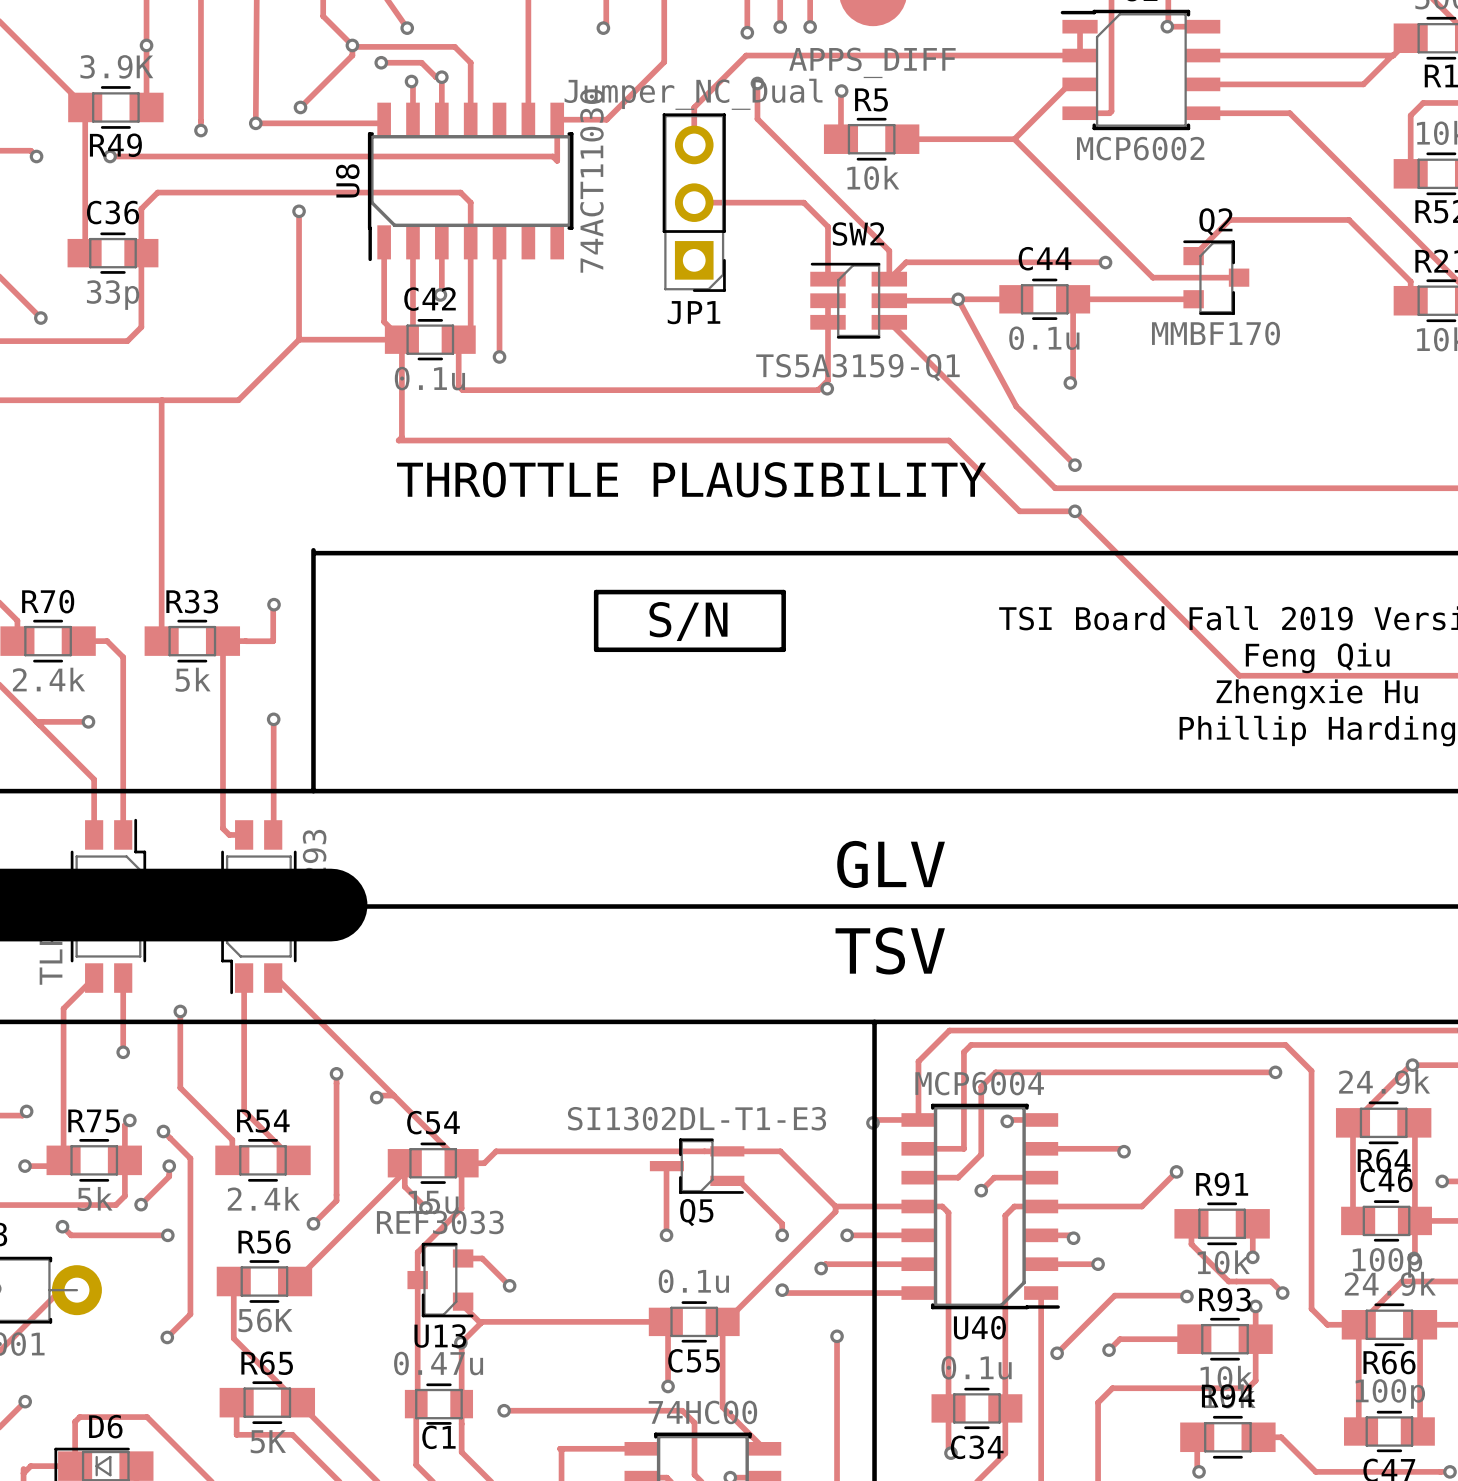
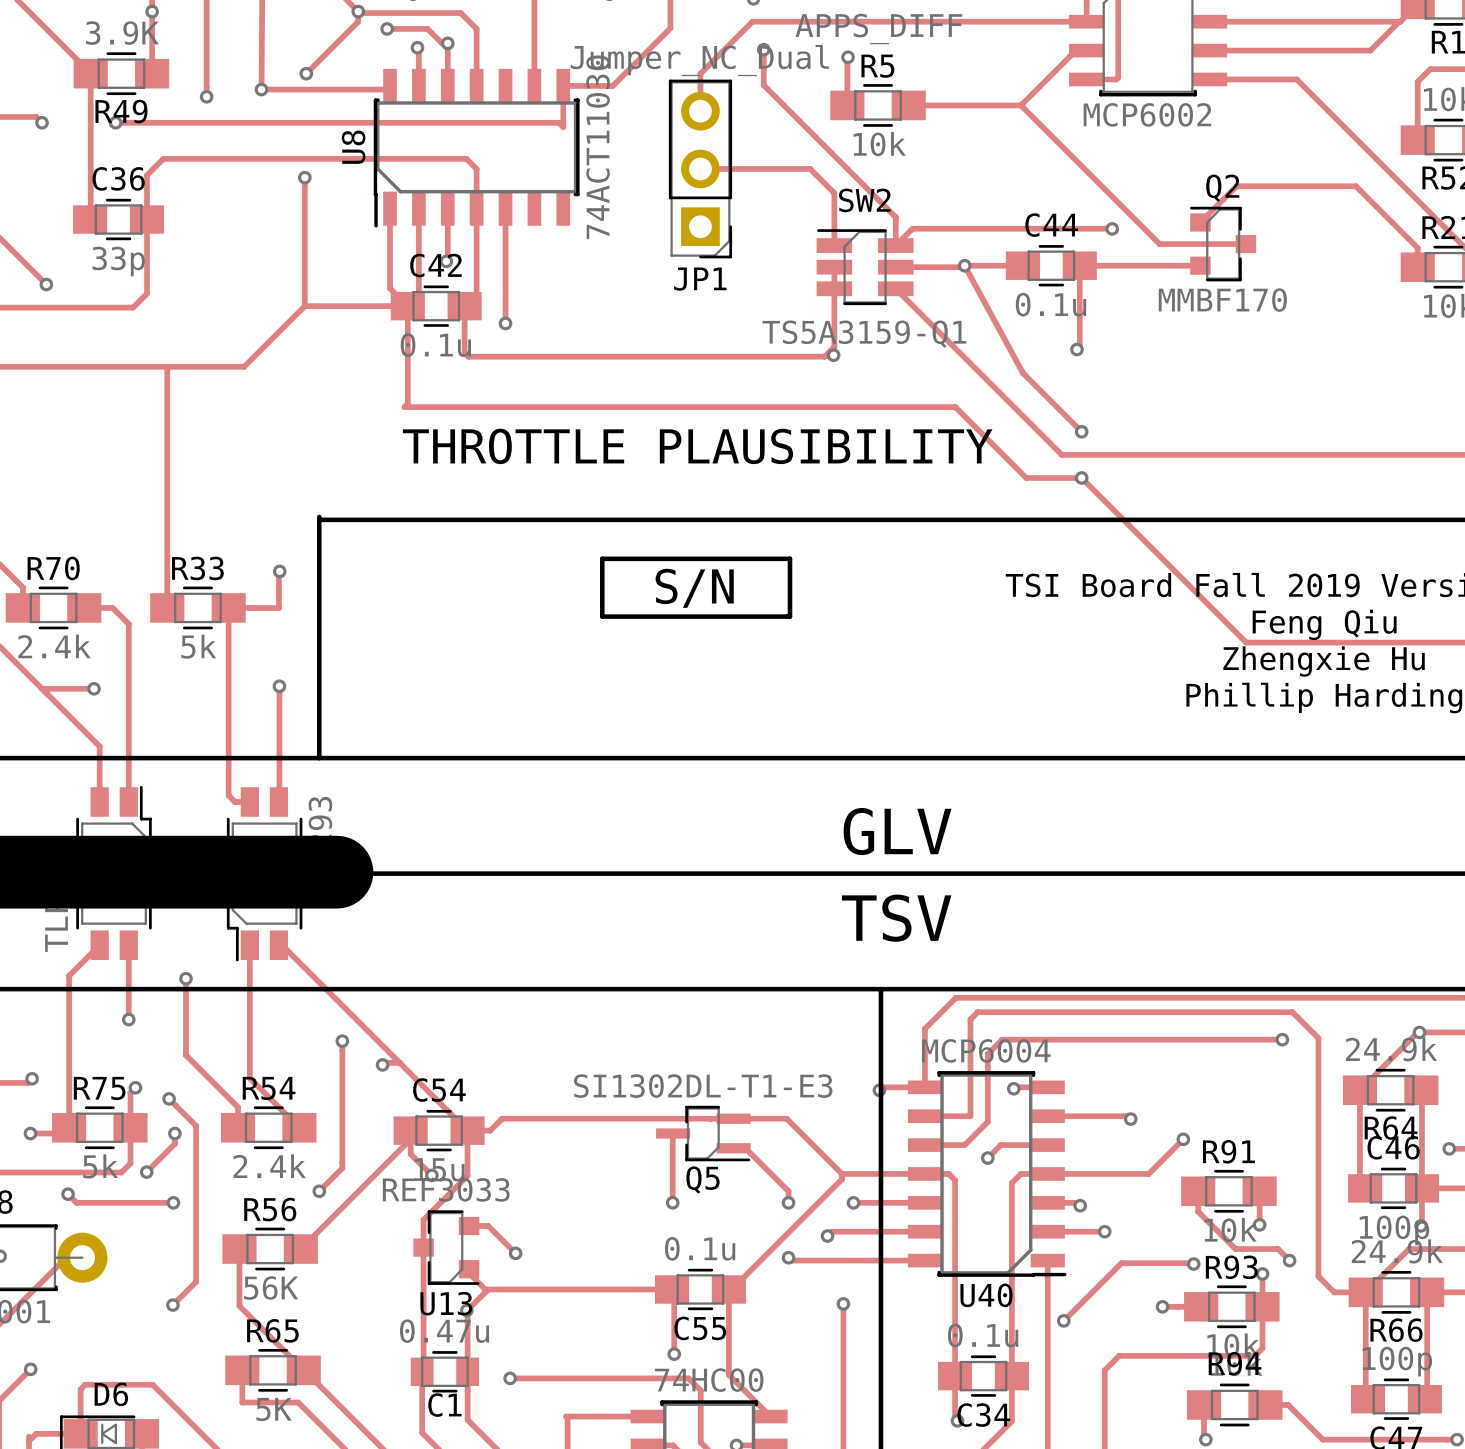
track: (1155, 1339) (1120, 1339) (1109, 1350) -> none
via position: (1109, 1350) -> (1162, 1306)

